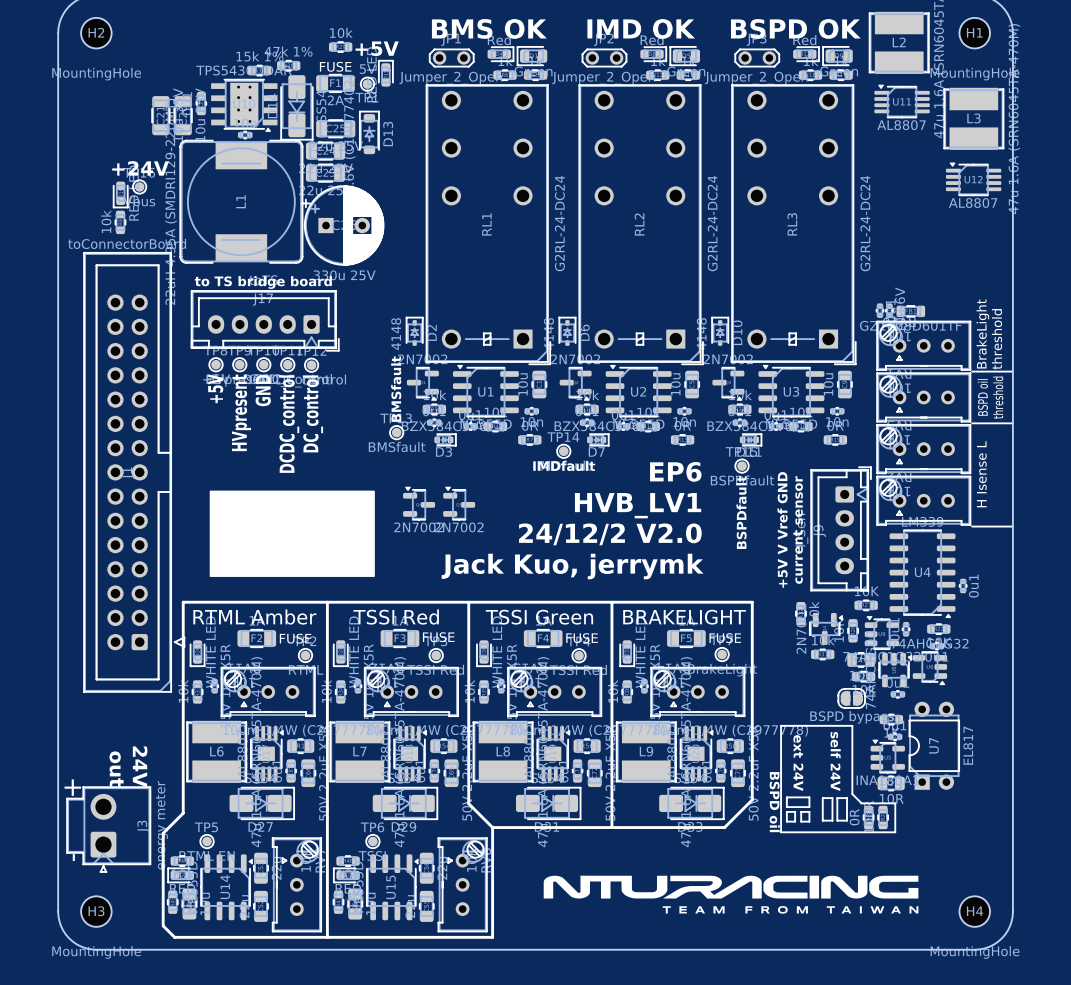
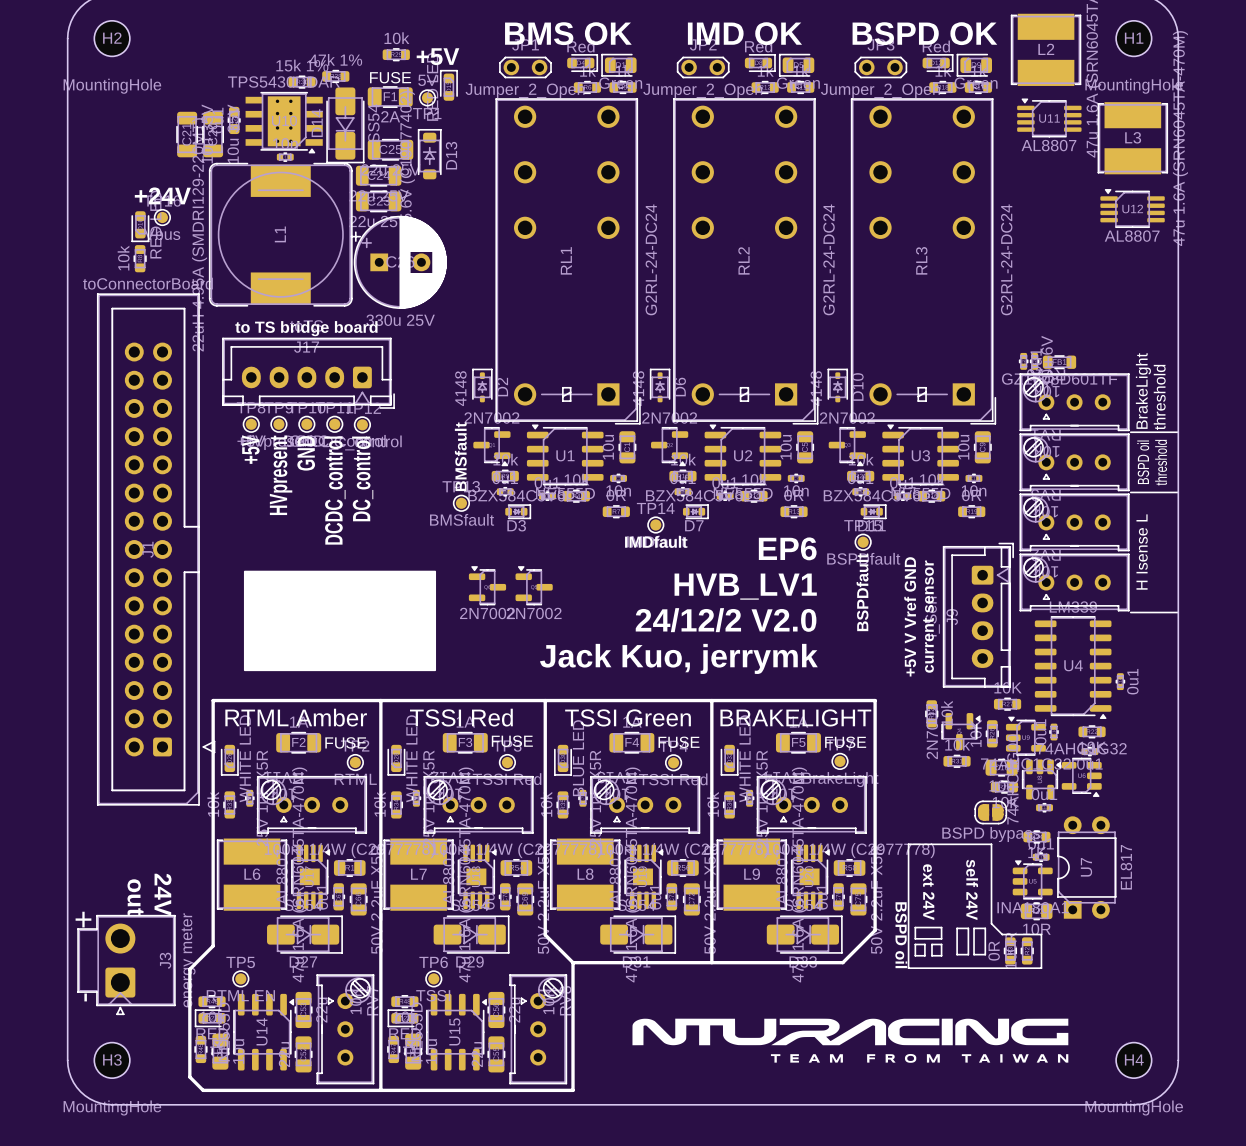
part value: WHITE LED (497, 652) -> BLUE LED (578, 758)

